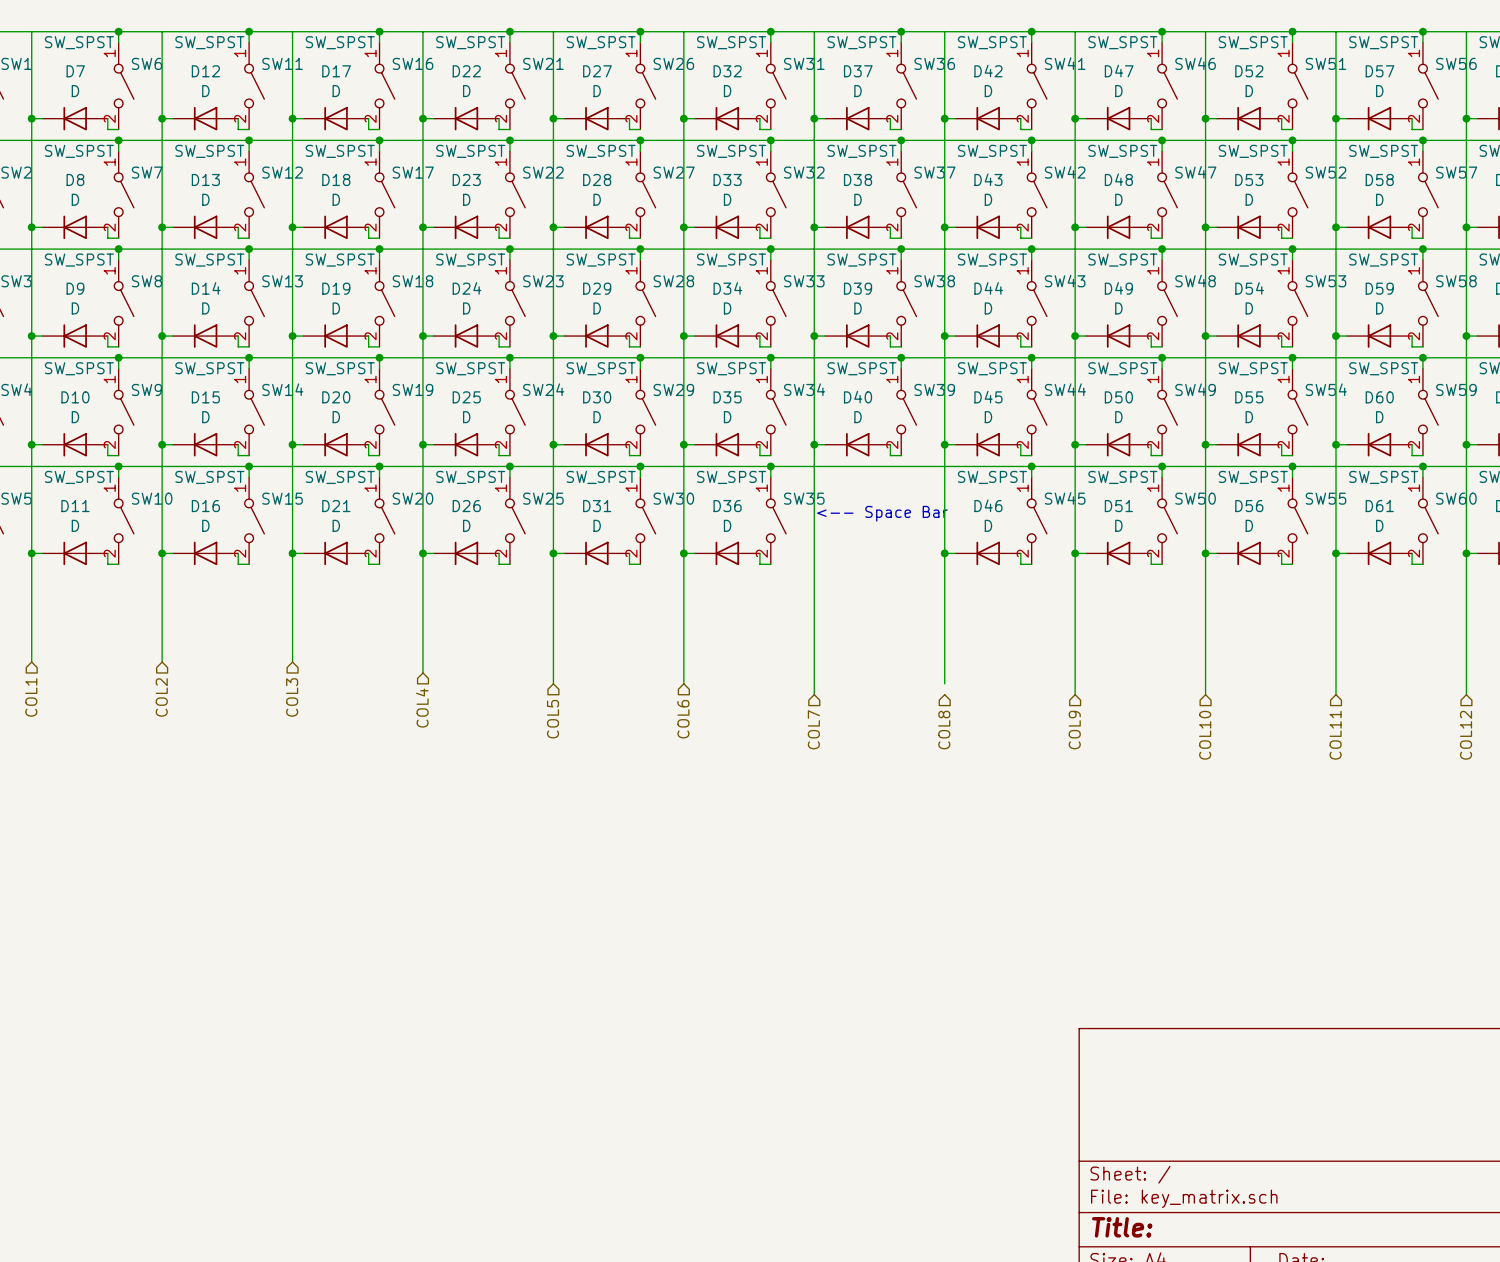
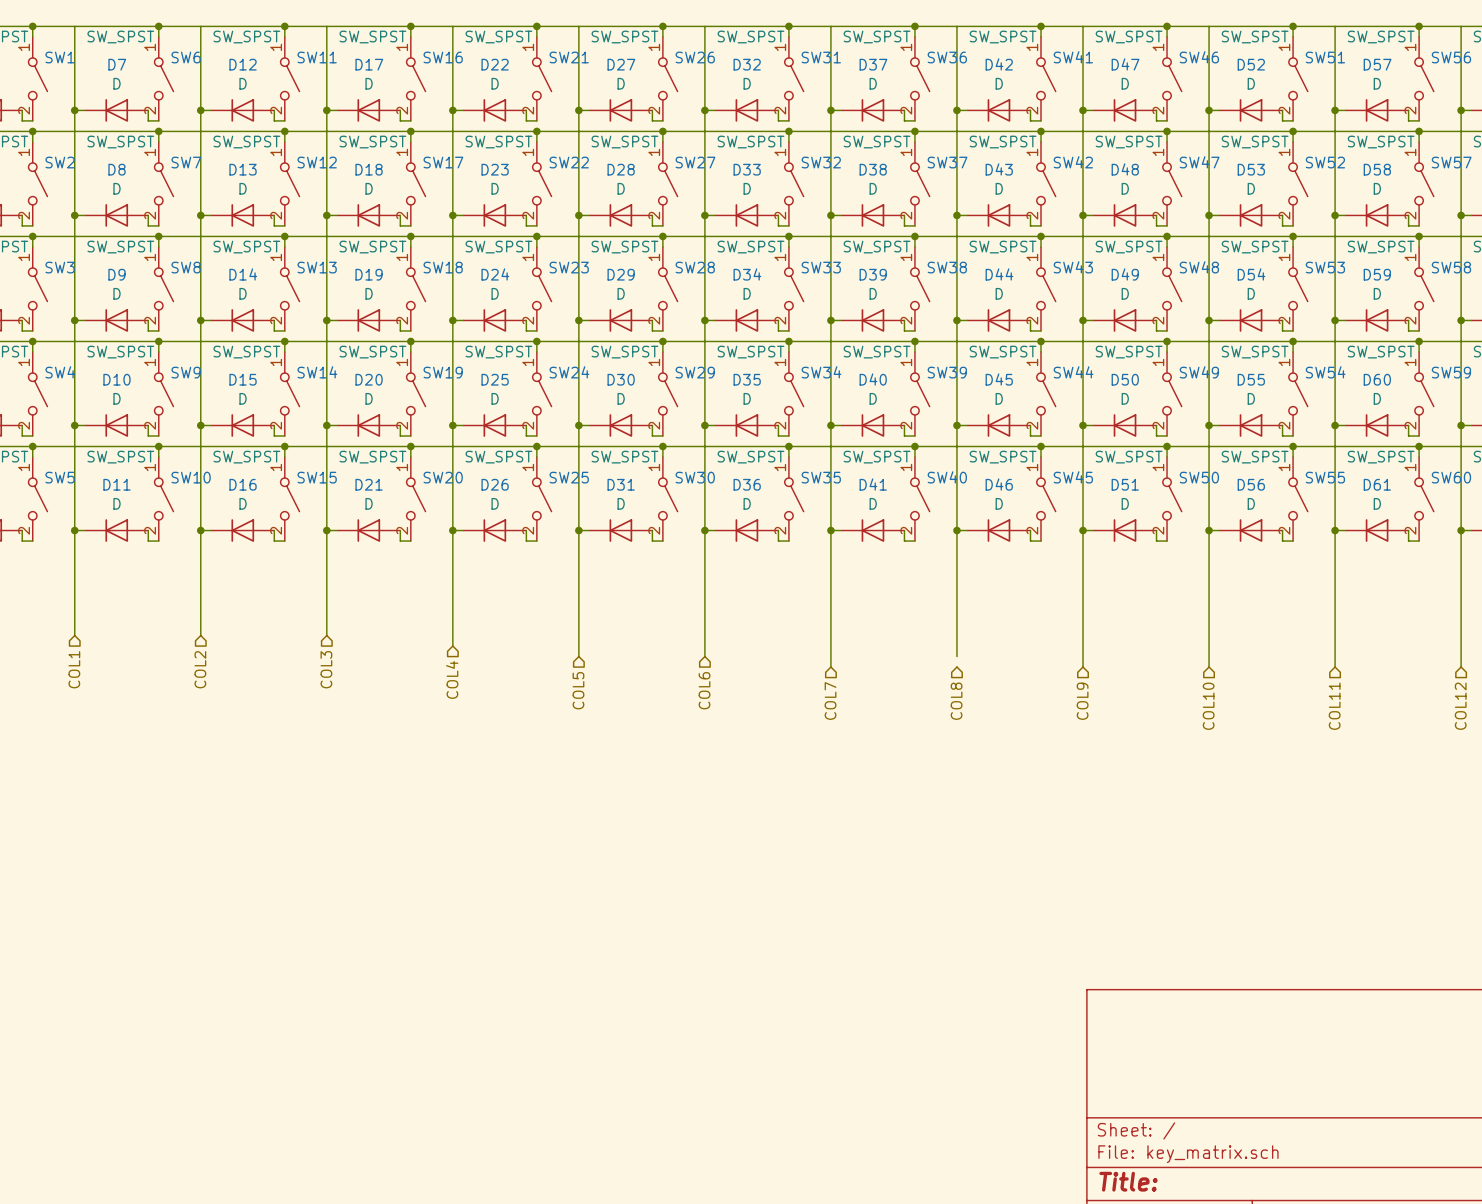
wire: none -> (914, 446) (914, 457)
junction: none -> (914, 446)
text: <-- Space Bar (882, 513) -> none
SW40: none -> SW_SPST (920, 499)
wire: none -> (830, 530) (841, 530)
junction: none -> (830, 530)
D41: none -> D (872, 530)
wire: none -> (904, 530) (904, 541) (914, 541)

